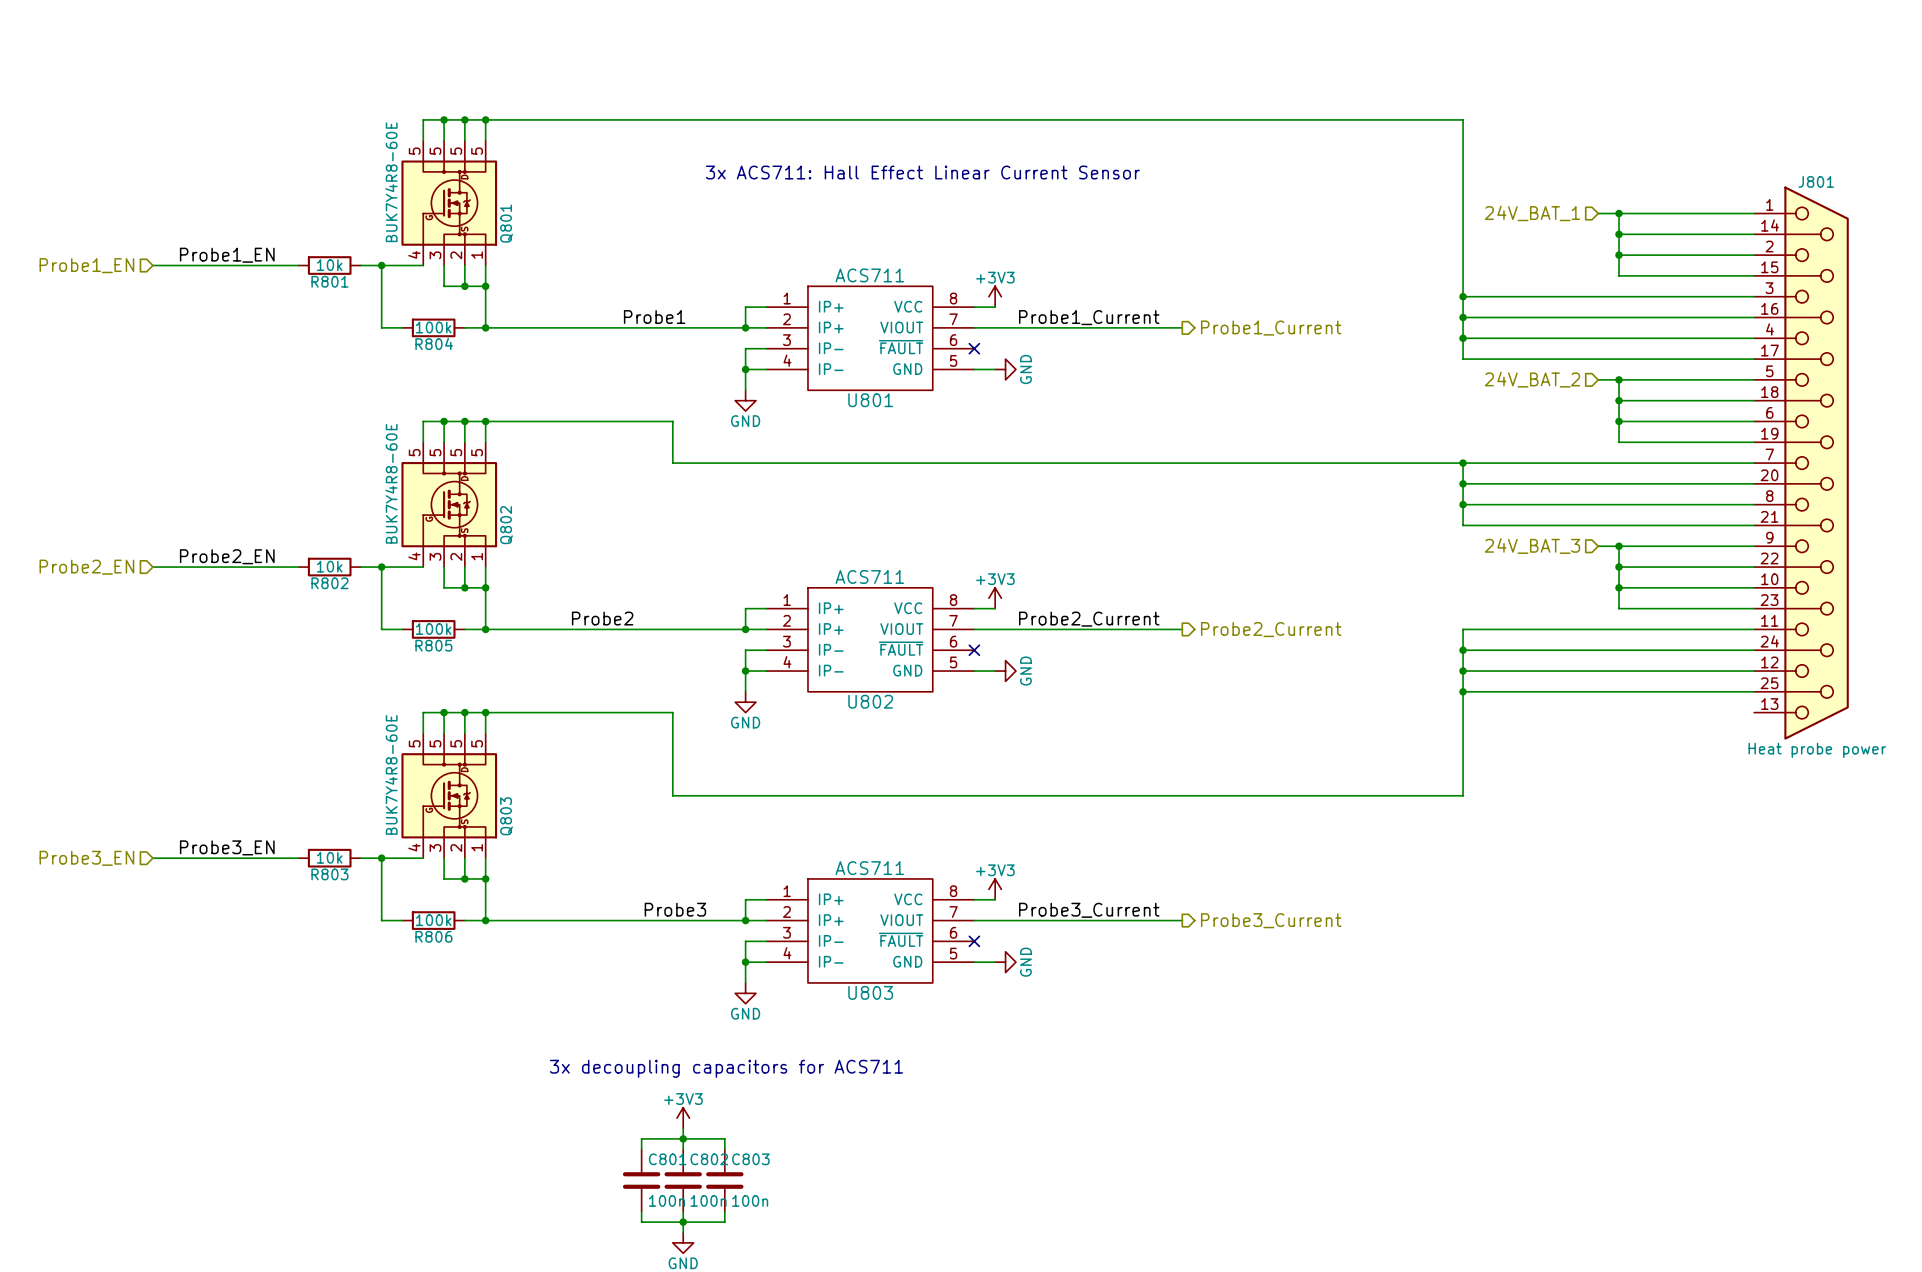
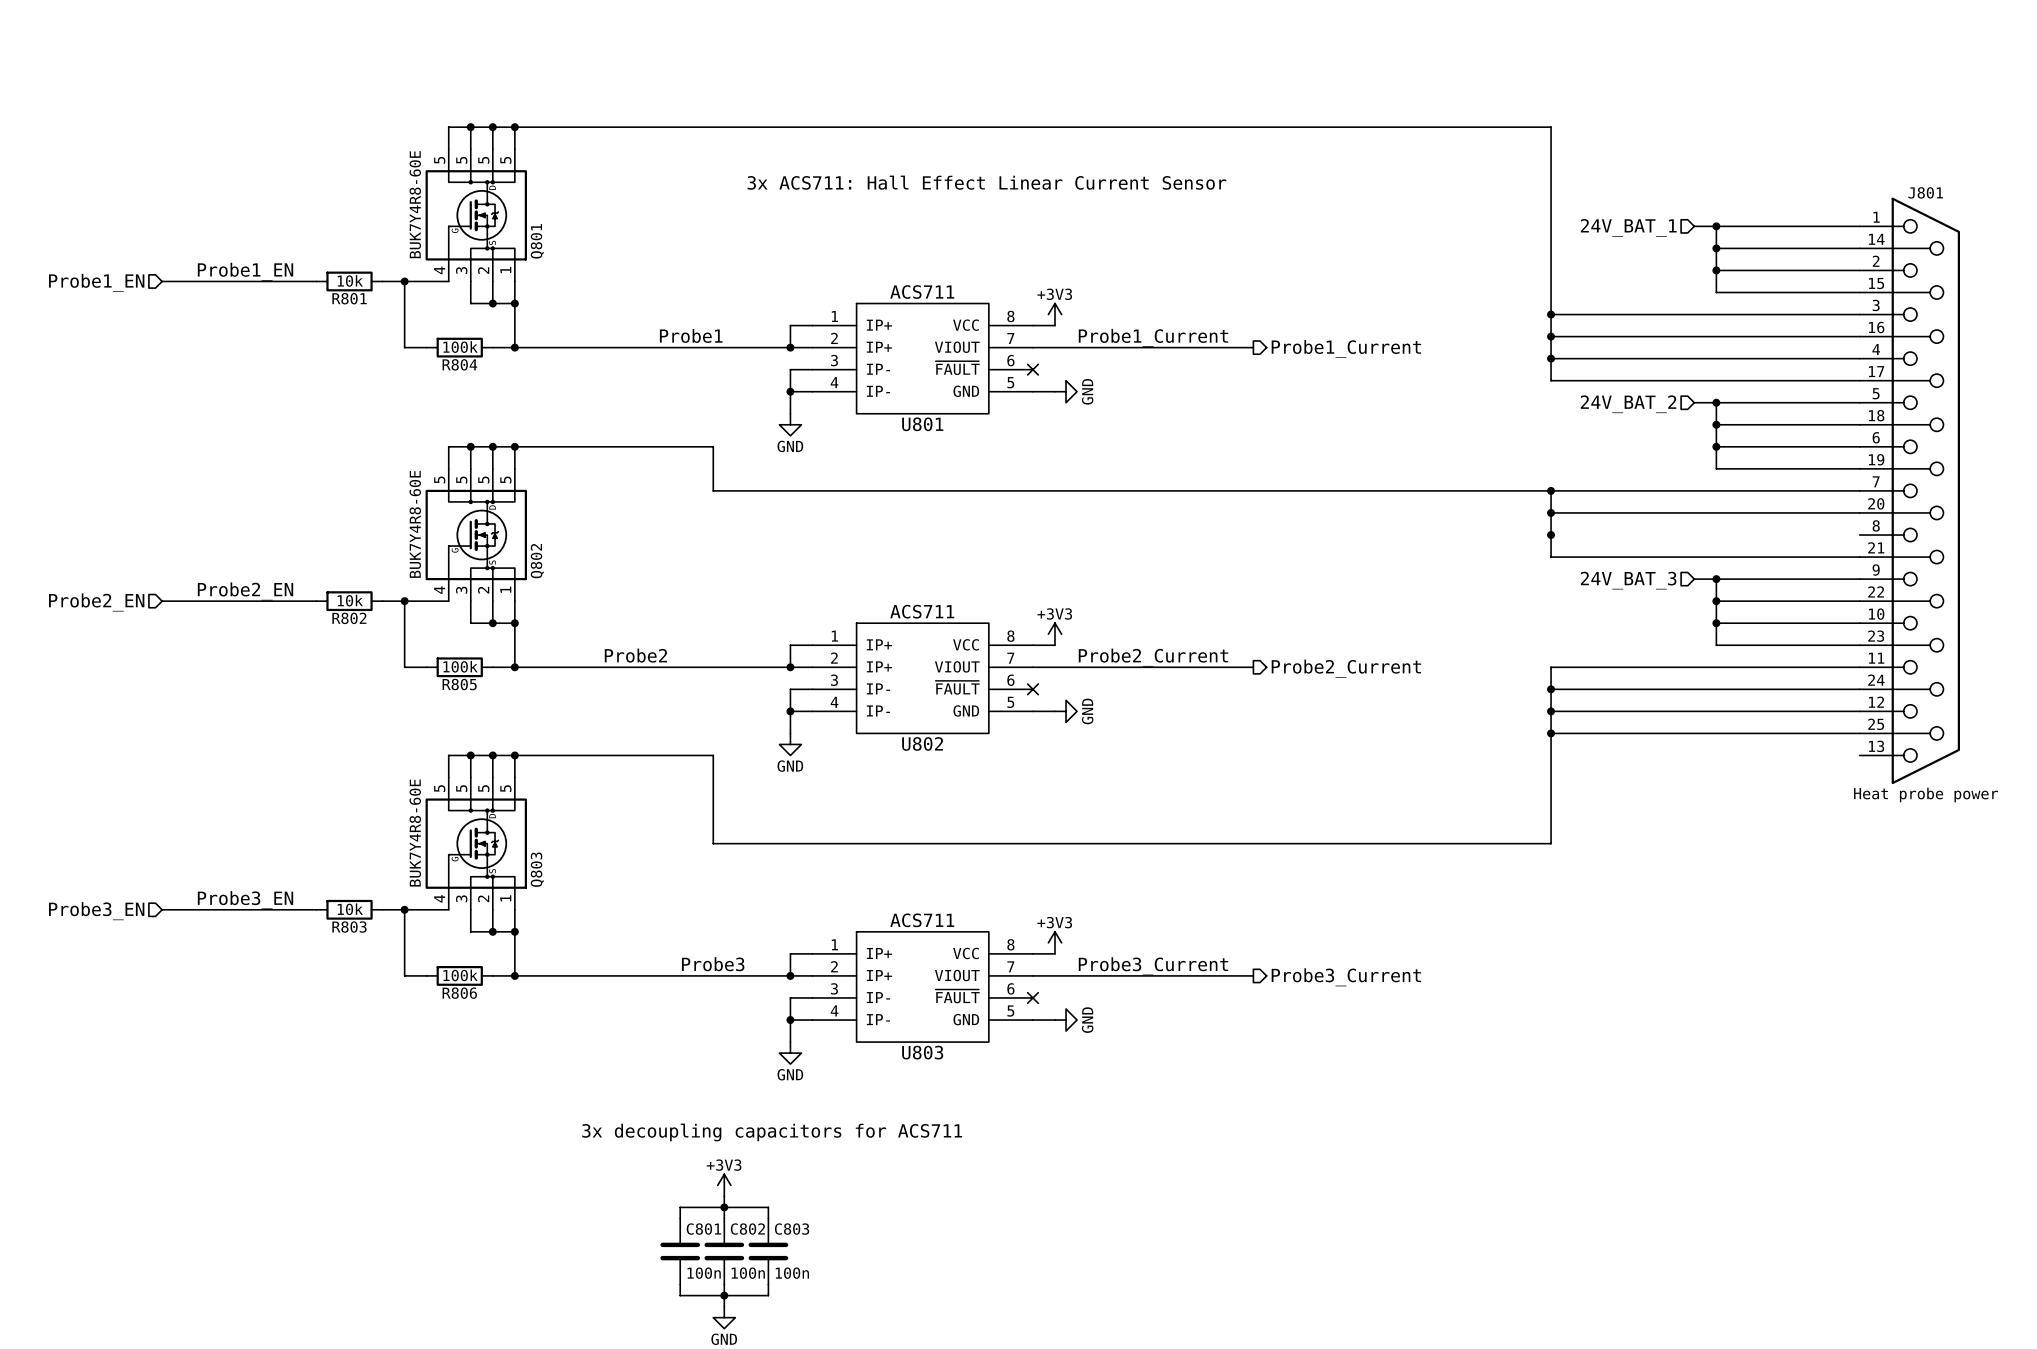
wire: (1463, 504) (1754, 504) -> none

